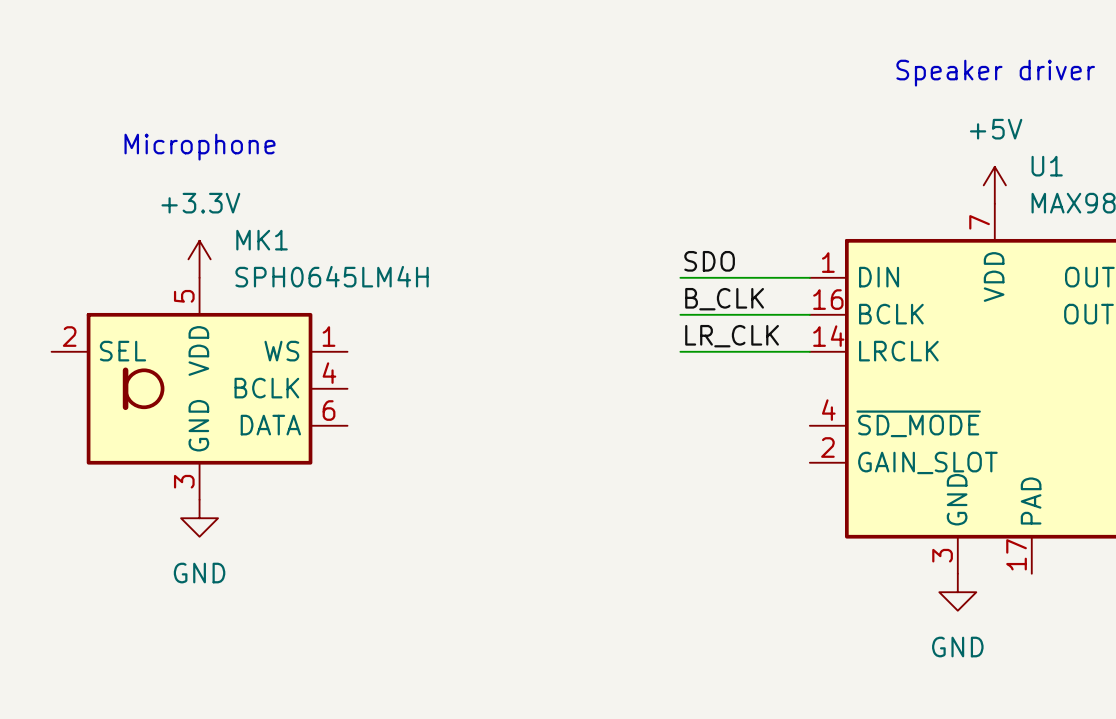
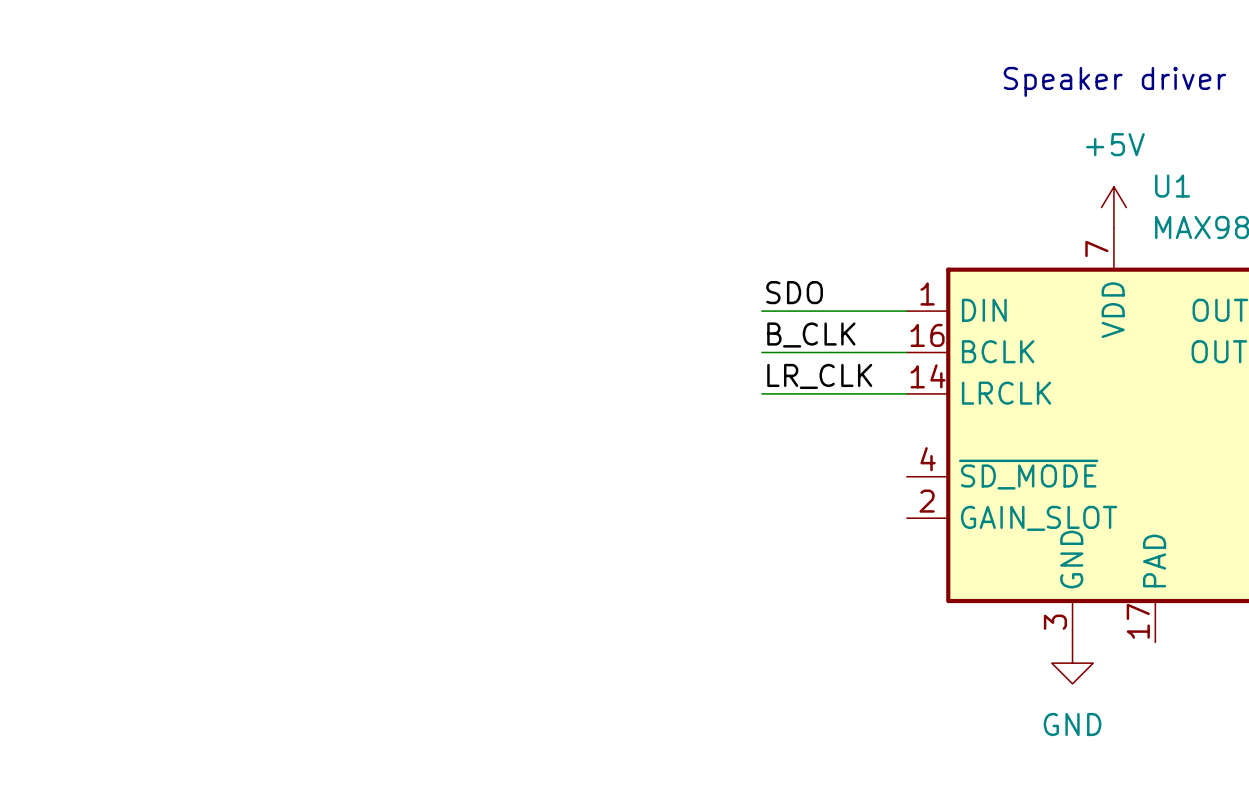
text: Microphone (199, 147) -> none
power symbol: +3.3V (199, 259) -> none
MK1: SPH0645LM4H (199, 388) -> none
power symbol: GND (199, 518) -> none

